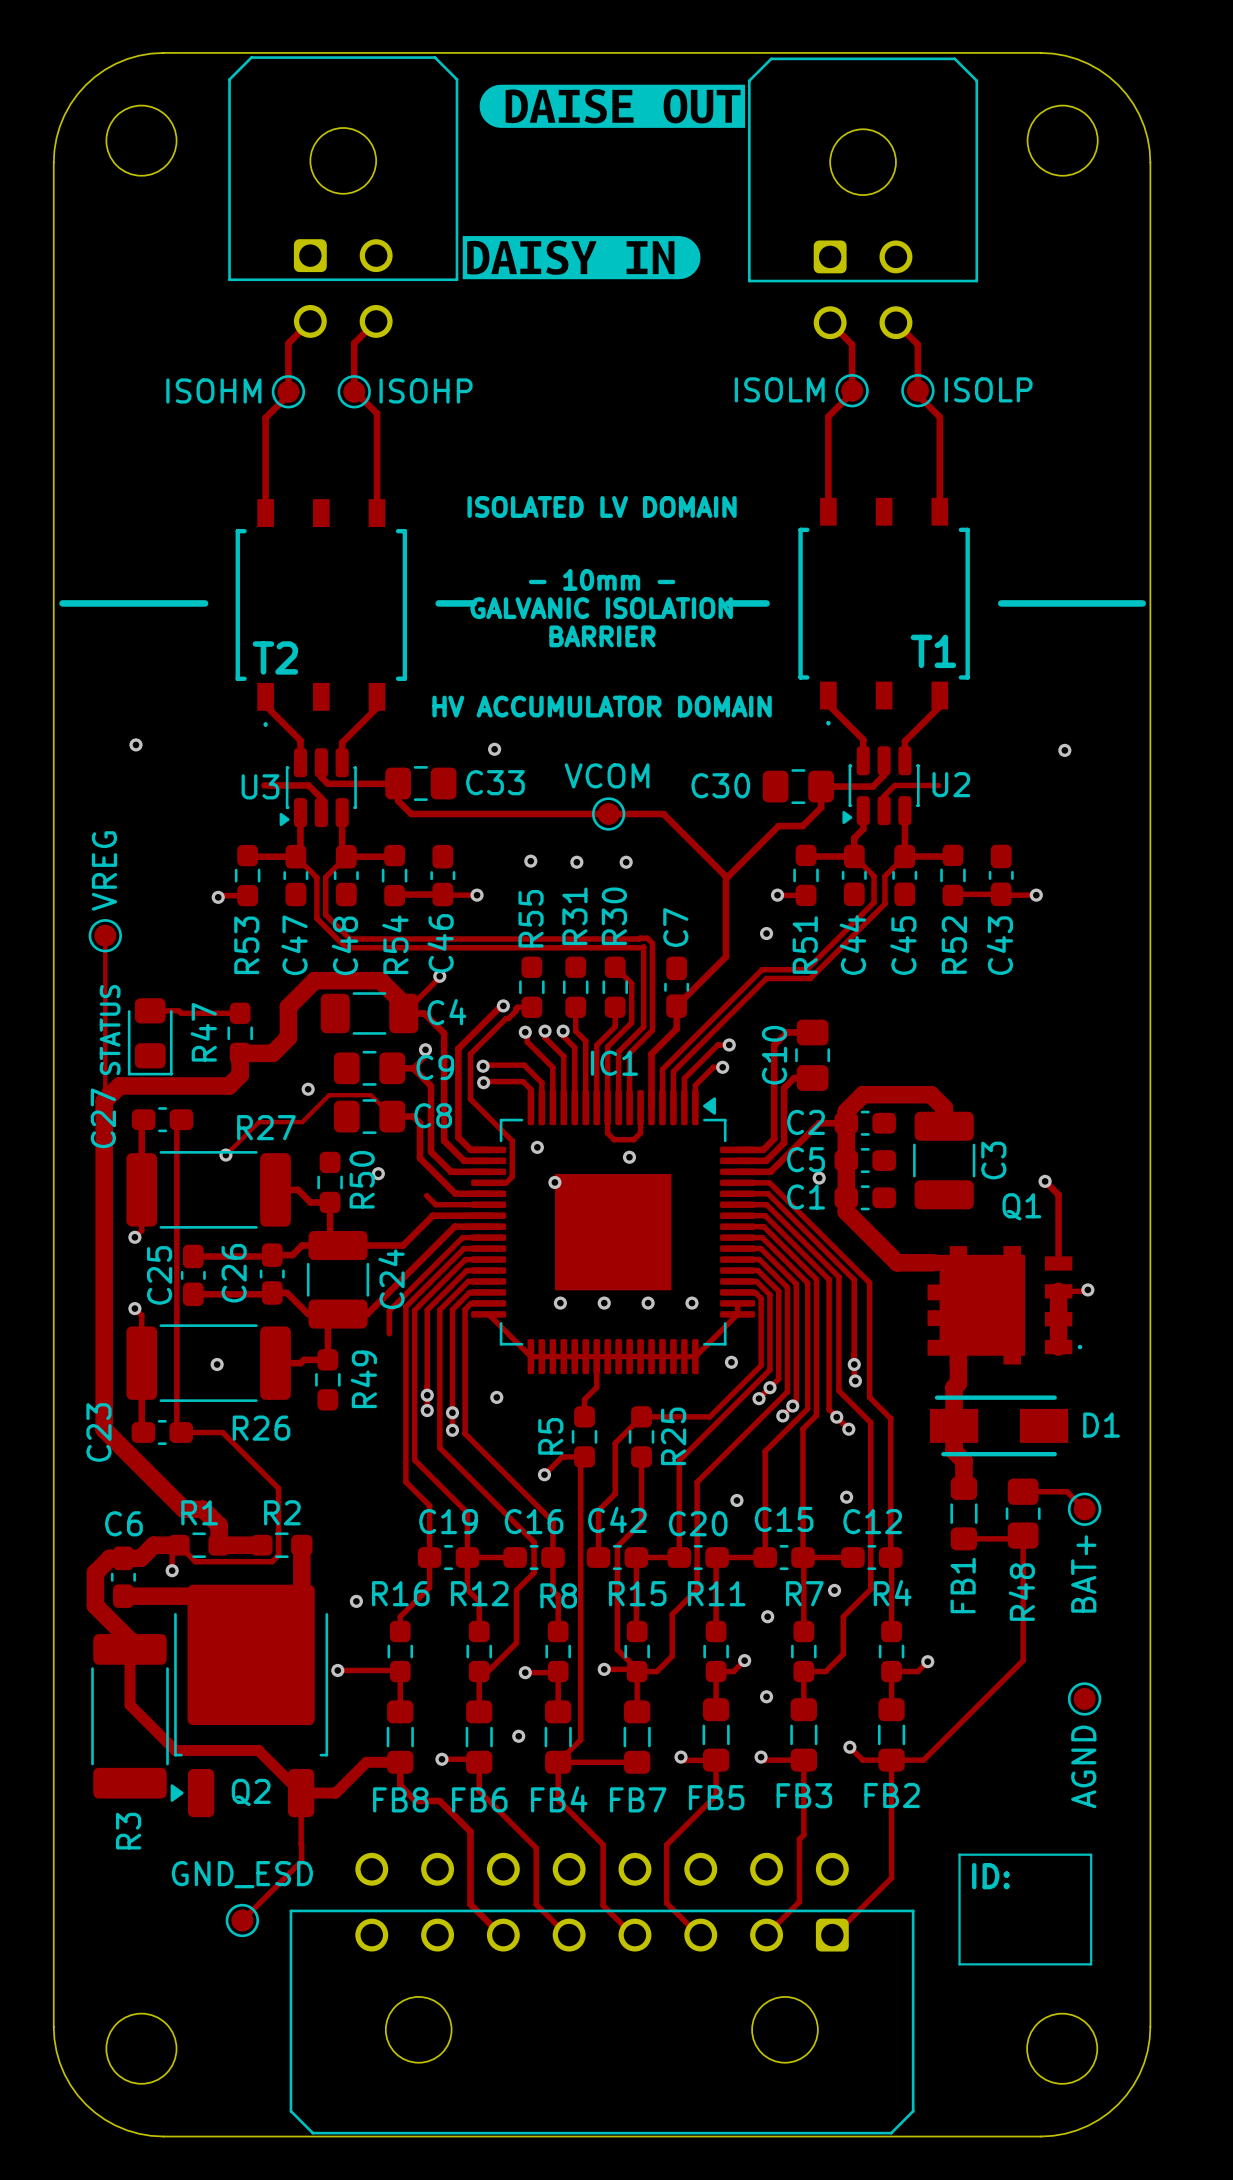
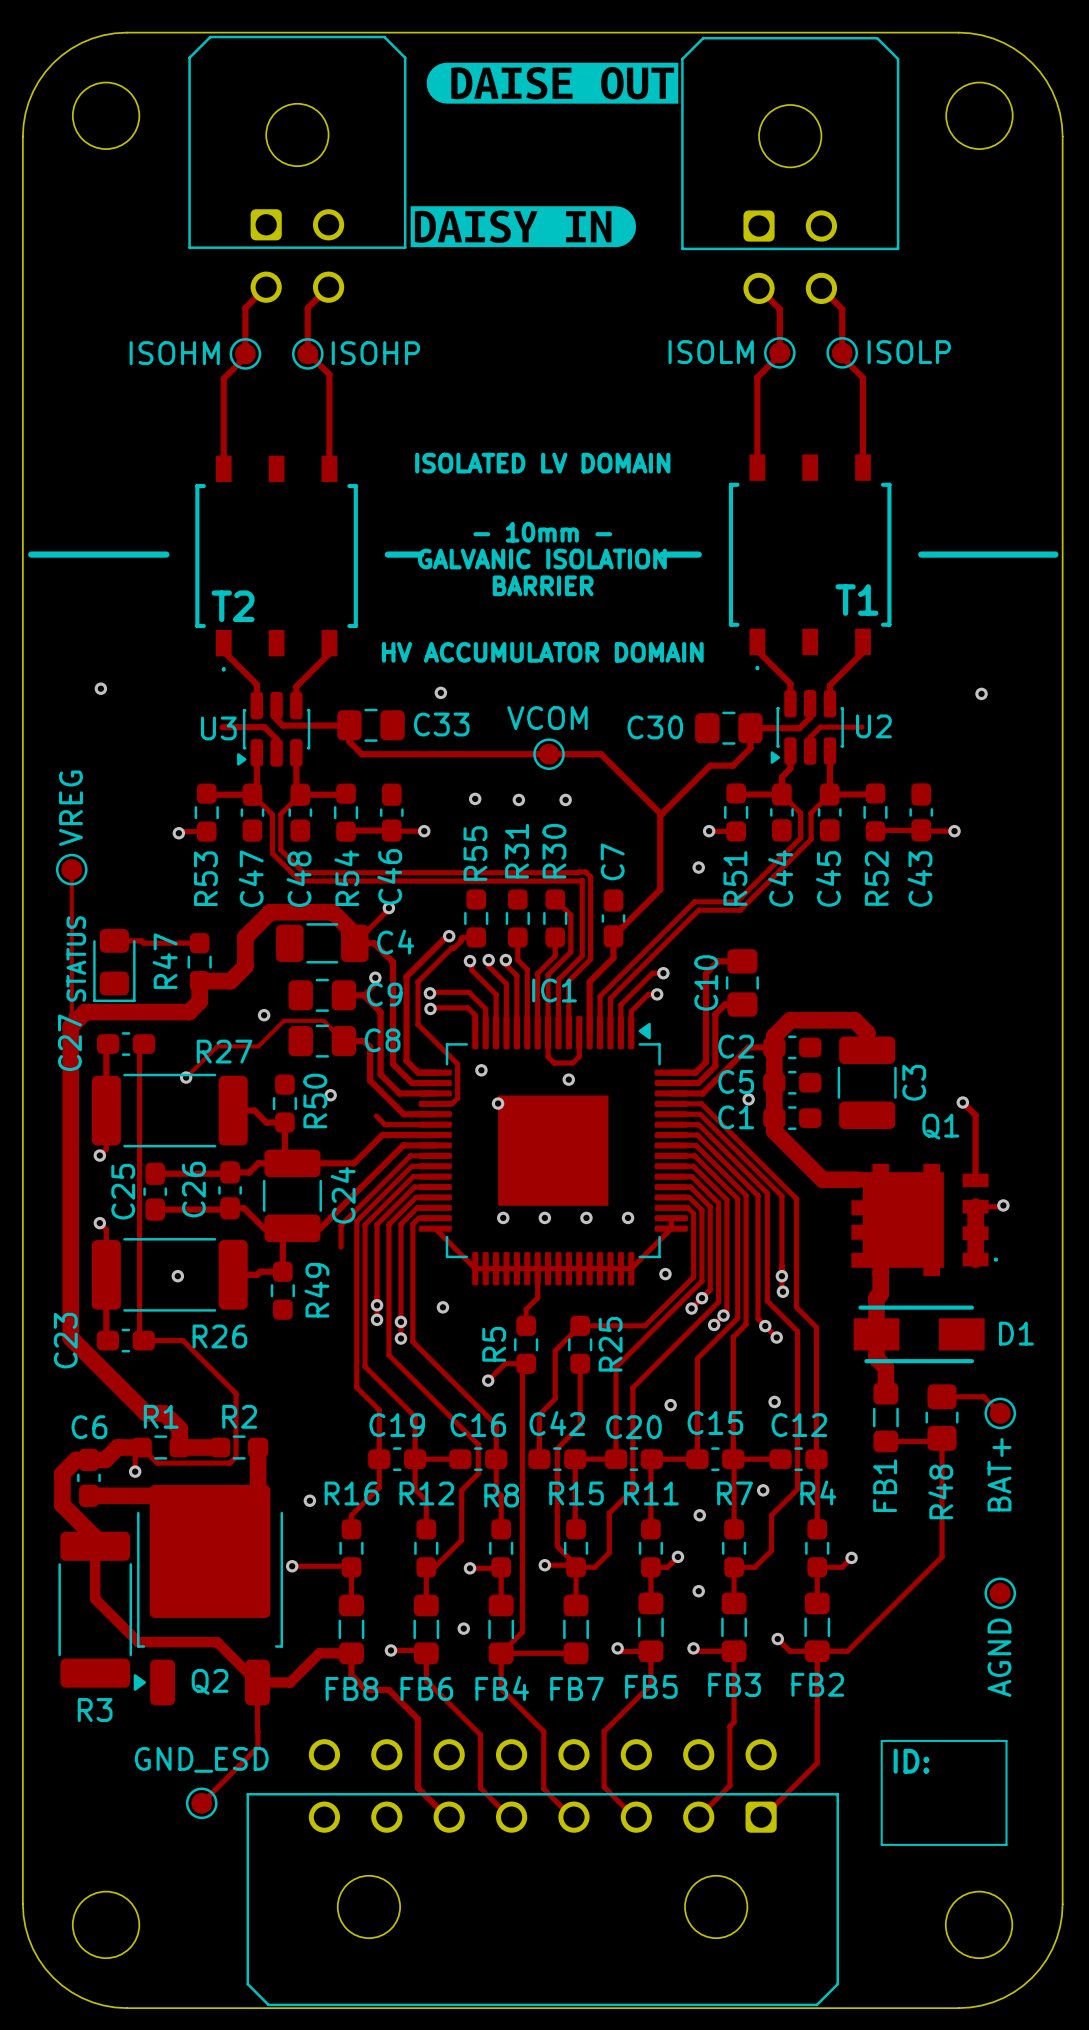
R3 name rotation: 0° (128, 1831) -> 90° clockwise (95, 1709)

